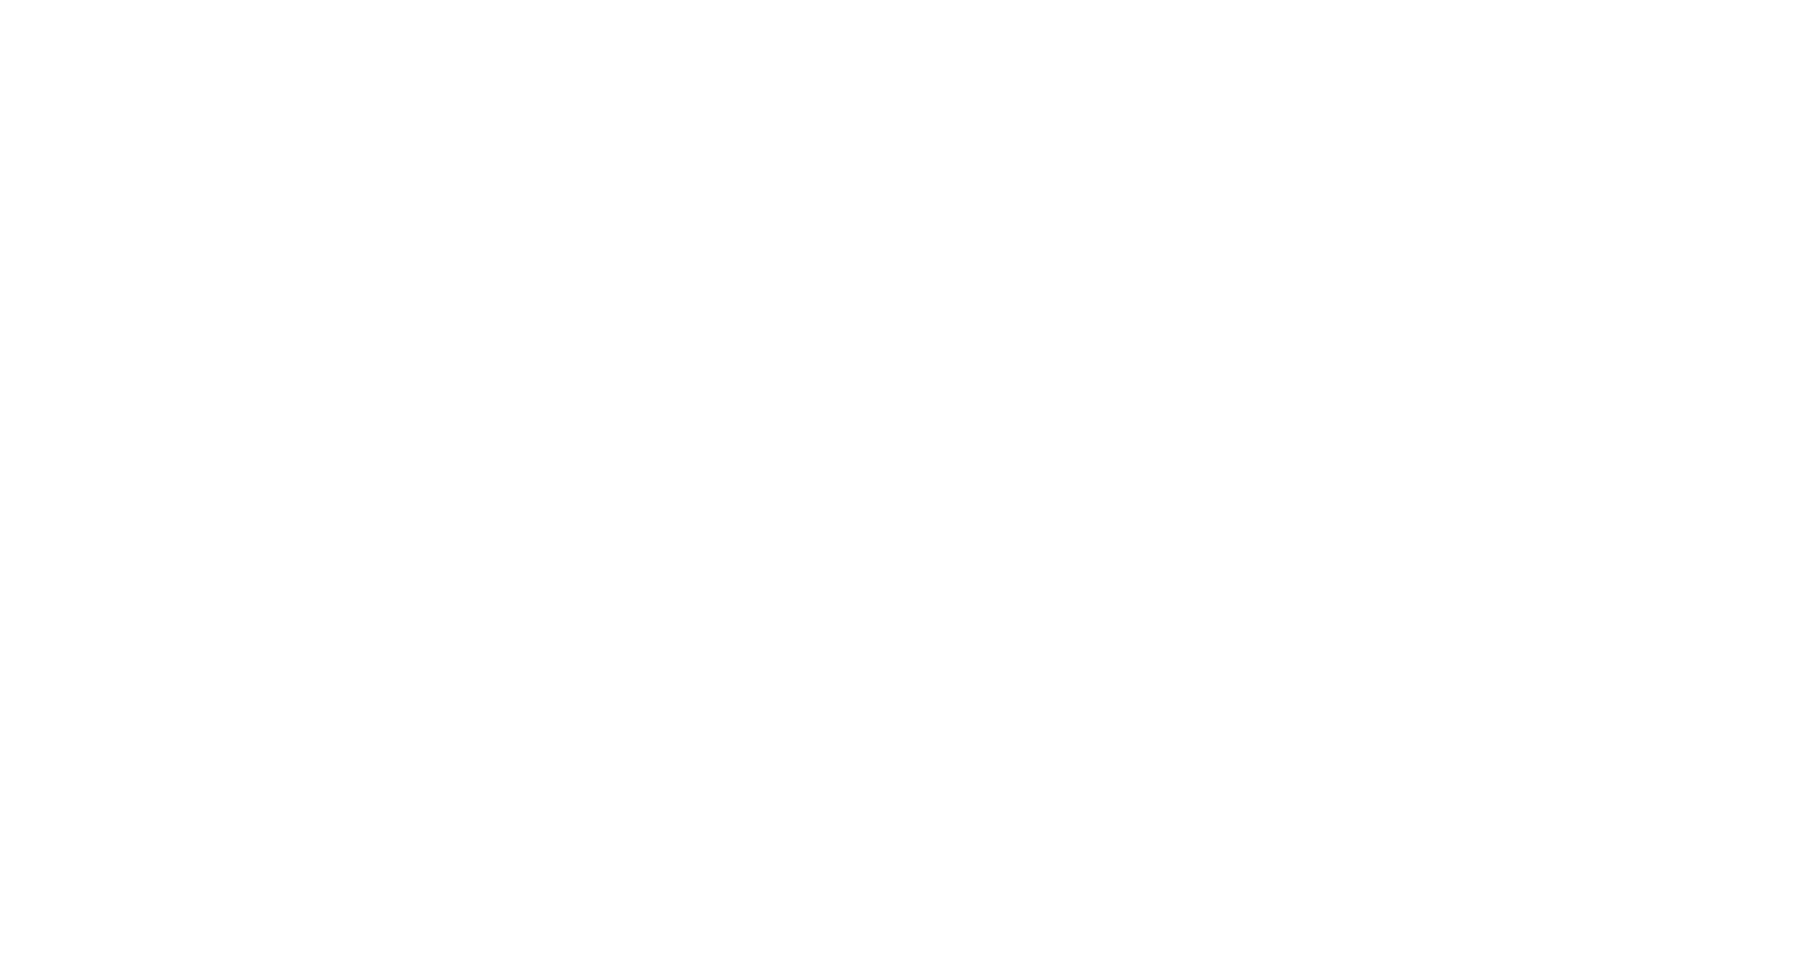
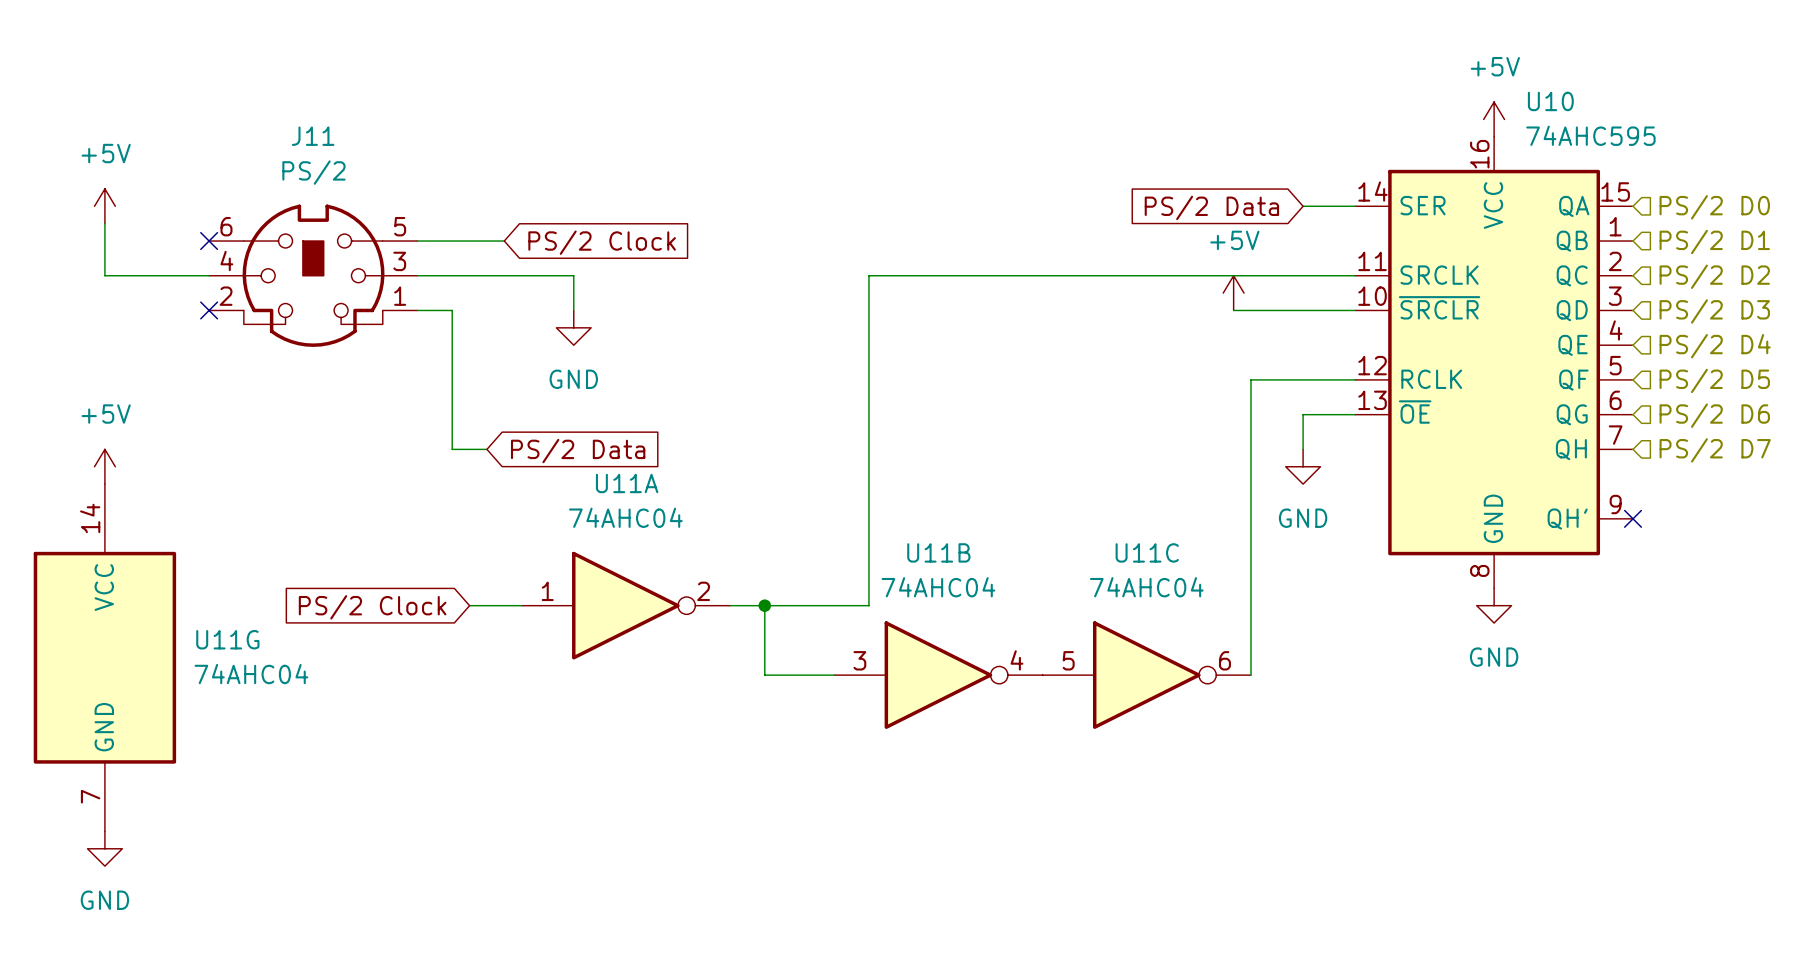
power symbol: none -> +5V (1494, 119)
power symbol: none -> +5V (104, 206)
wire: none -> (1303, 206) (1355, 206)
global label: none -> PS/2 Data (1211, 207)
hierarchical label: none -> PS/2 D0 (1714, 207)
wire: none -> (104, 223) (104, 275) (209, 275)
no-connect mark: none -> (209, 241)
wire: none -> (417, 241) (504, 241)
global label: none -> PS/2 Clock (602, 242)
hierarchical label: none -> PS/2 D1 (1714, 242)
J11: none -> PS/2 (313, 275)
wire: none -> (417, 275) (573, 275) (573, 310)
wire: none -> (1355, 275) (868, 275) (868, 605) (730, 605)
hierarchical label: none -> PS/2 D2 (1714, 276)
power symbol: none -> +5V (1233, 293)
no-connect mark: none -> (209, 310)
wire: none -> (417, 310) (452, 310) (452, 449) (486, 449)
wire: none -> (1233, 310) (1355, 310)
hierarchical label: none -> PS/2 D3 (1714, 311)
power symbol: none -> GND (573, 327)
hierarchical label: none -> PS/2 D4 (1715, 346)
U10: none -> 74AHC595 (1494, 362)
wire: none -> (1355, 379) (1250, 379) (1250, 675)
hierarchical label: none -> PS/2 D5 (1714, 380)
wire: none -> (1355, 414) (1303, 414) (1303, 449)
hierarchical label: none -> PS/2 D6 (1714, 415)
hierarchical label: none -> PS/2 D7 (1715, 450)
global label: none -> PS/2 Data (578, 451)
power symbol: none -> +5V (104, 466)
power symbol: none -> GND (1303, 466)
no-connect mark: none -> (1633, 518)
wire: none -> (469, 605) (521, 605)
U11A: none -> 74AHC04 (625, 605)
wire: none -> (764, 605) (764, 675) (834, 675)
junction: none -> (764, 605)
power symbol: none -> GND (1494, 605)
global label: none -> PS/2 Clock (372, 607)
U11G: none -> 74AHC04 (104, 657)
U11B: none -> 74AHC04 (938, 675)
U11C: none -> 74AHC04 (1146, 675)
power symbol: none -> GND (104, 848)

